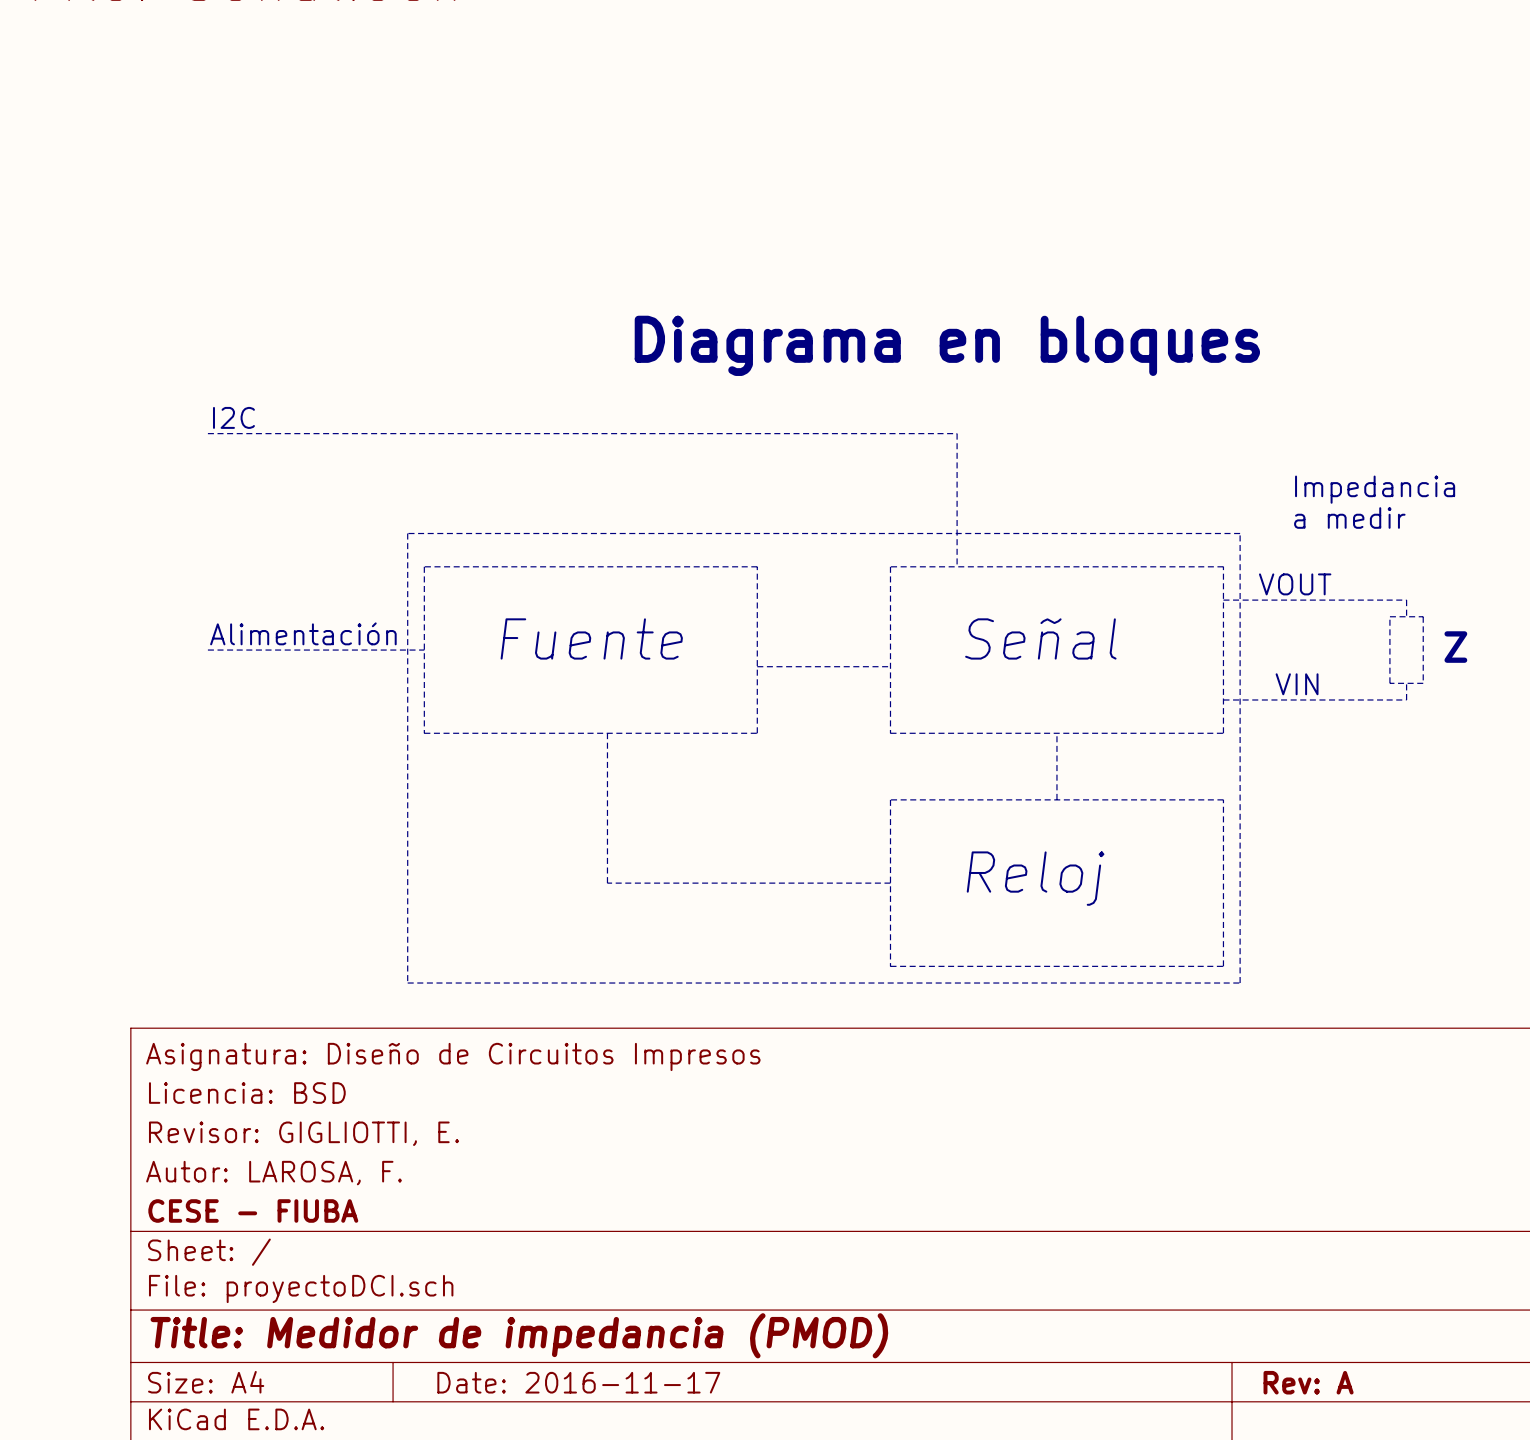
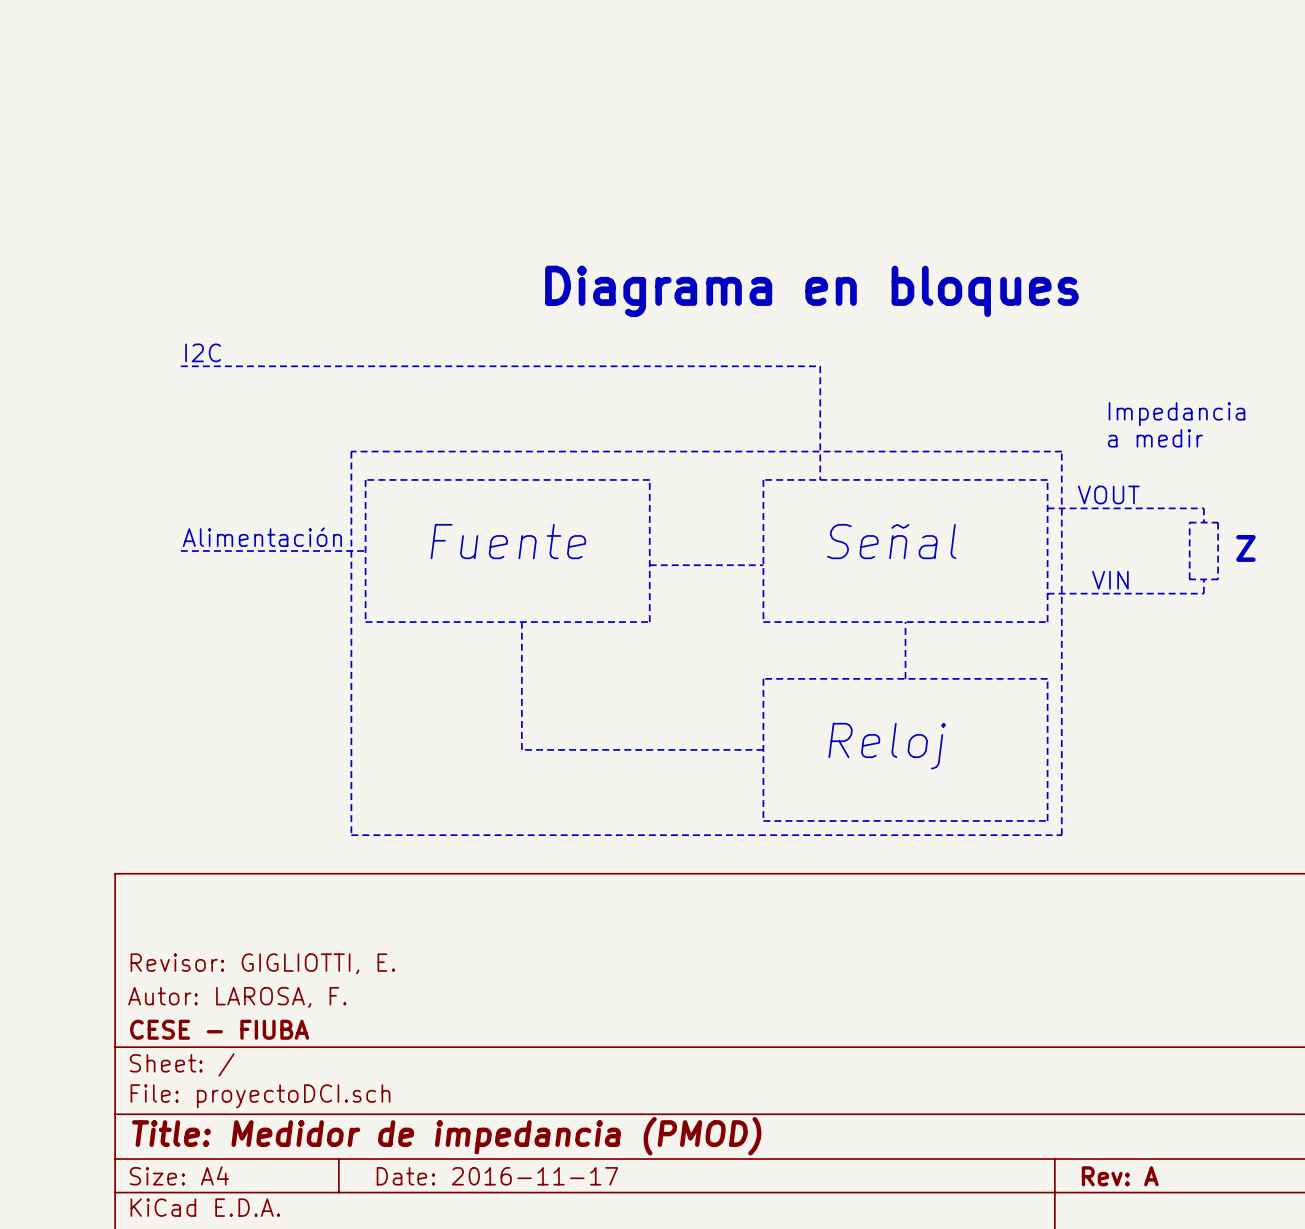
title block: Asignatura: Diseño de Circuitos Impresos (453, 1056) -> none
title block: Licencia: BSD (247, 1093) -> none

